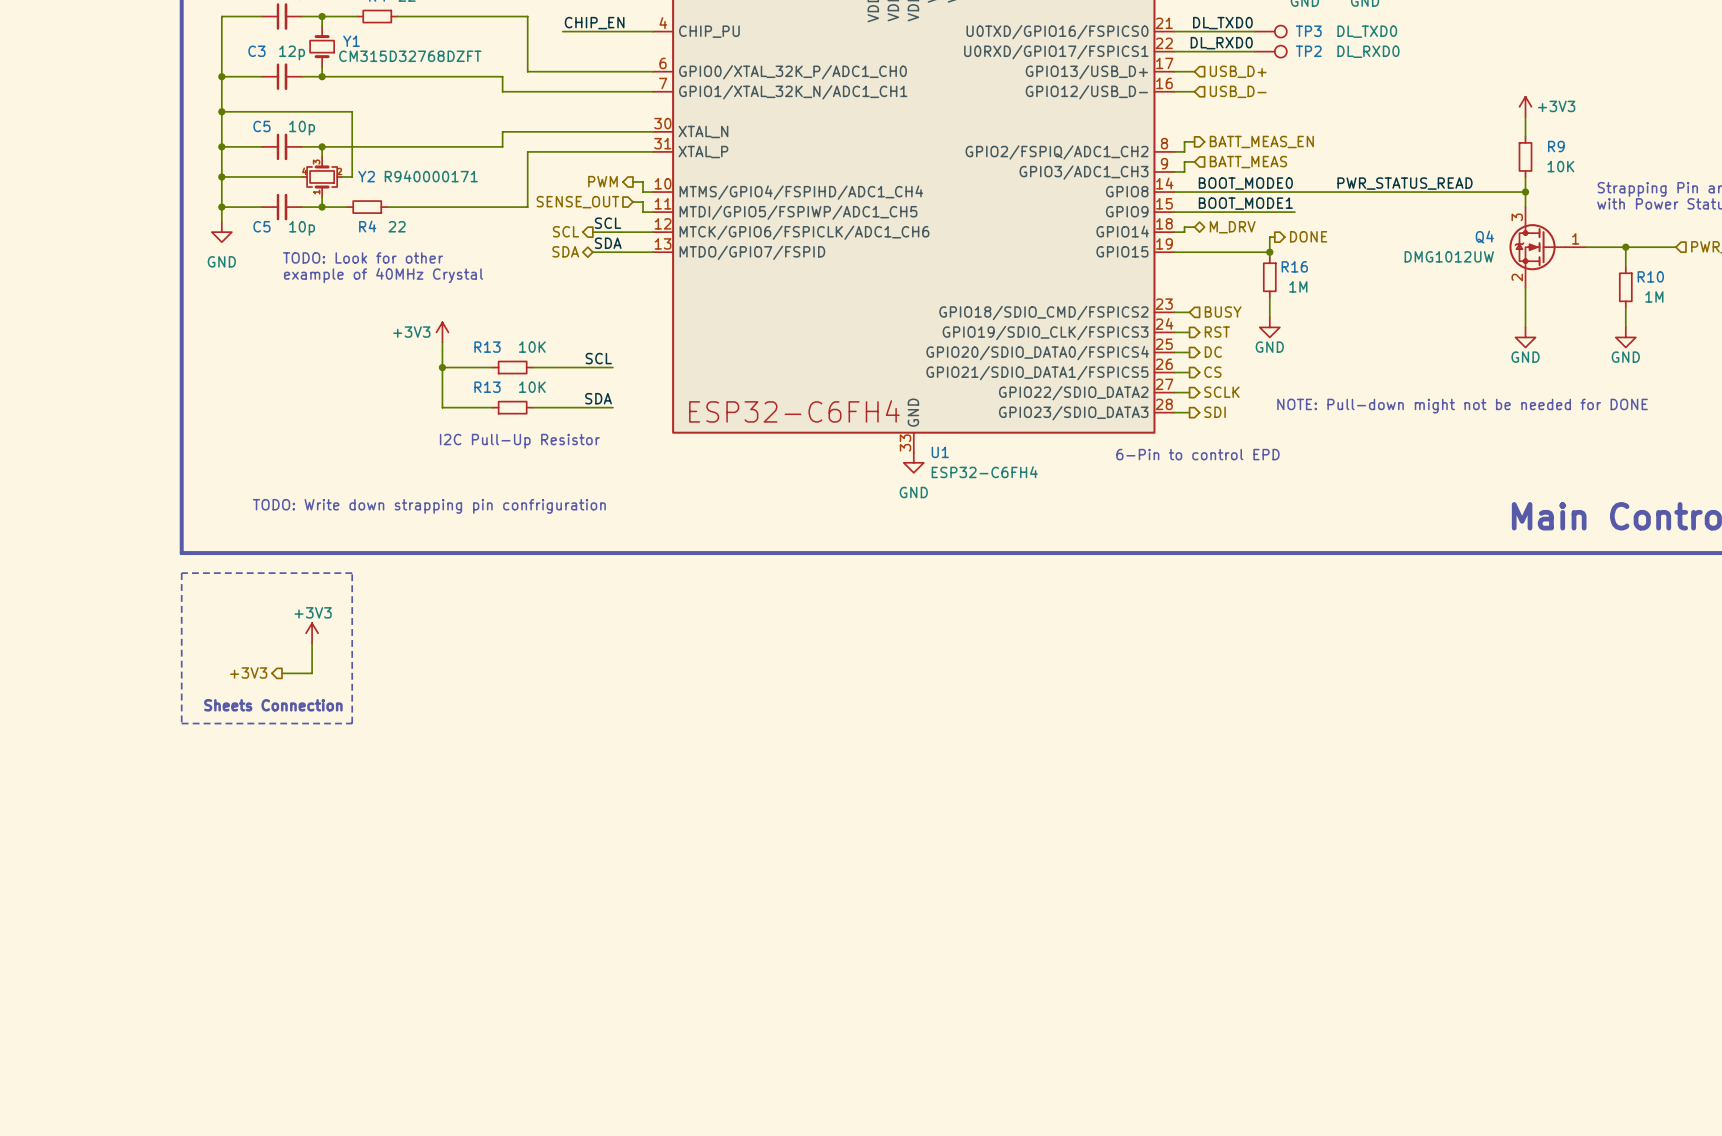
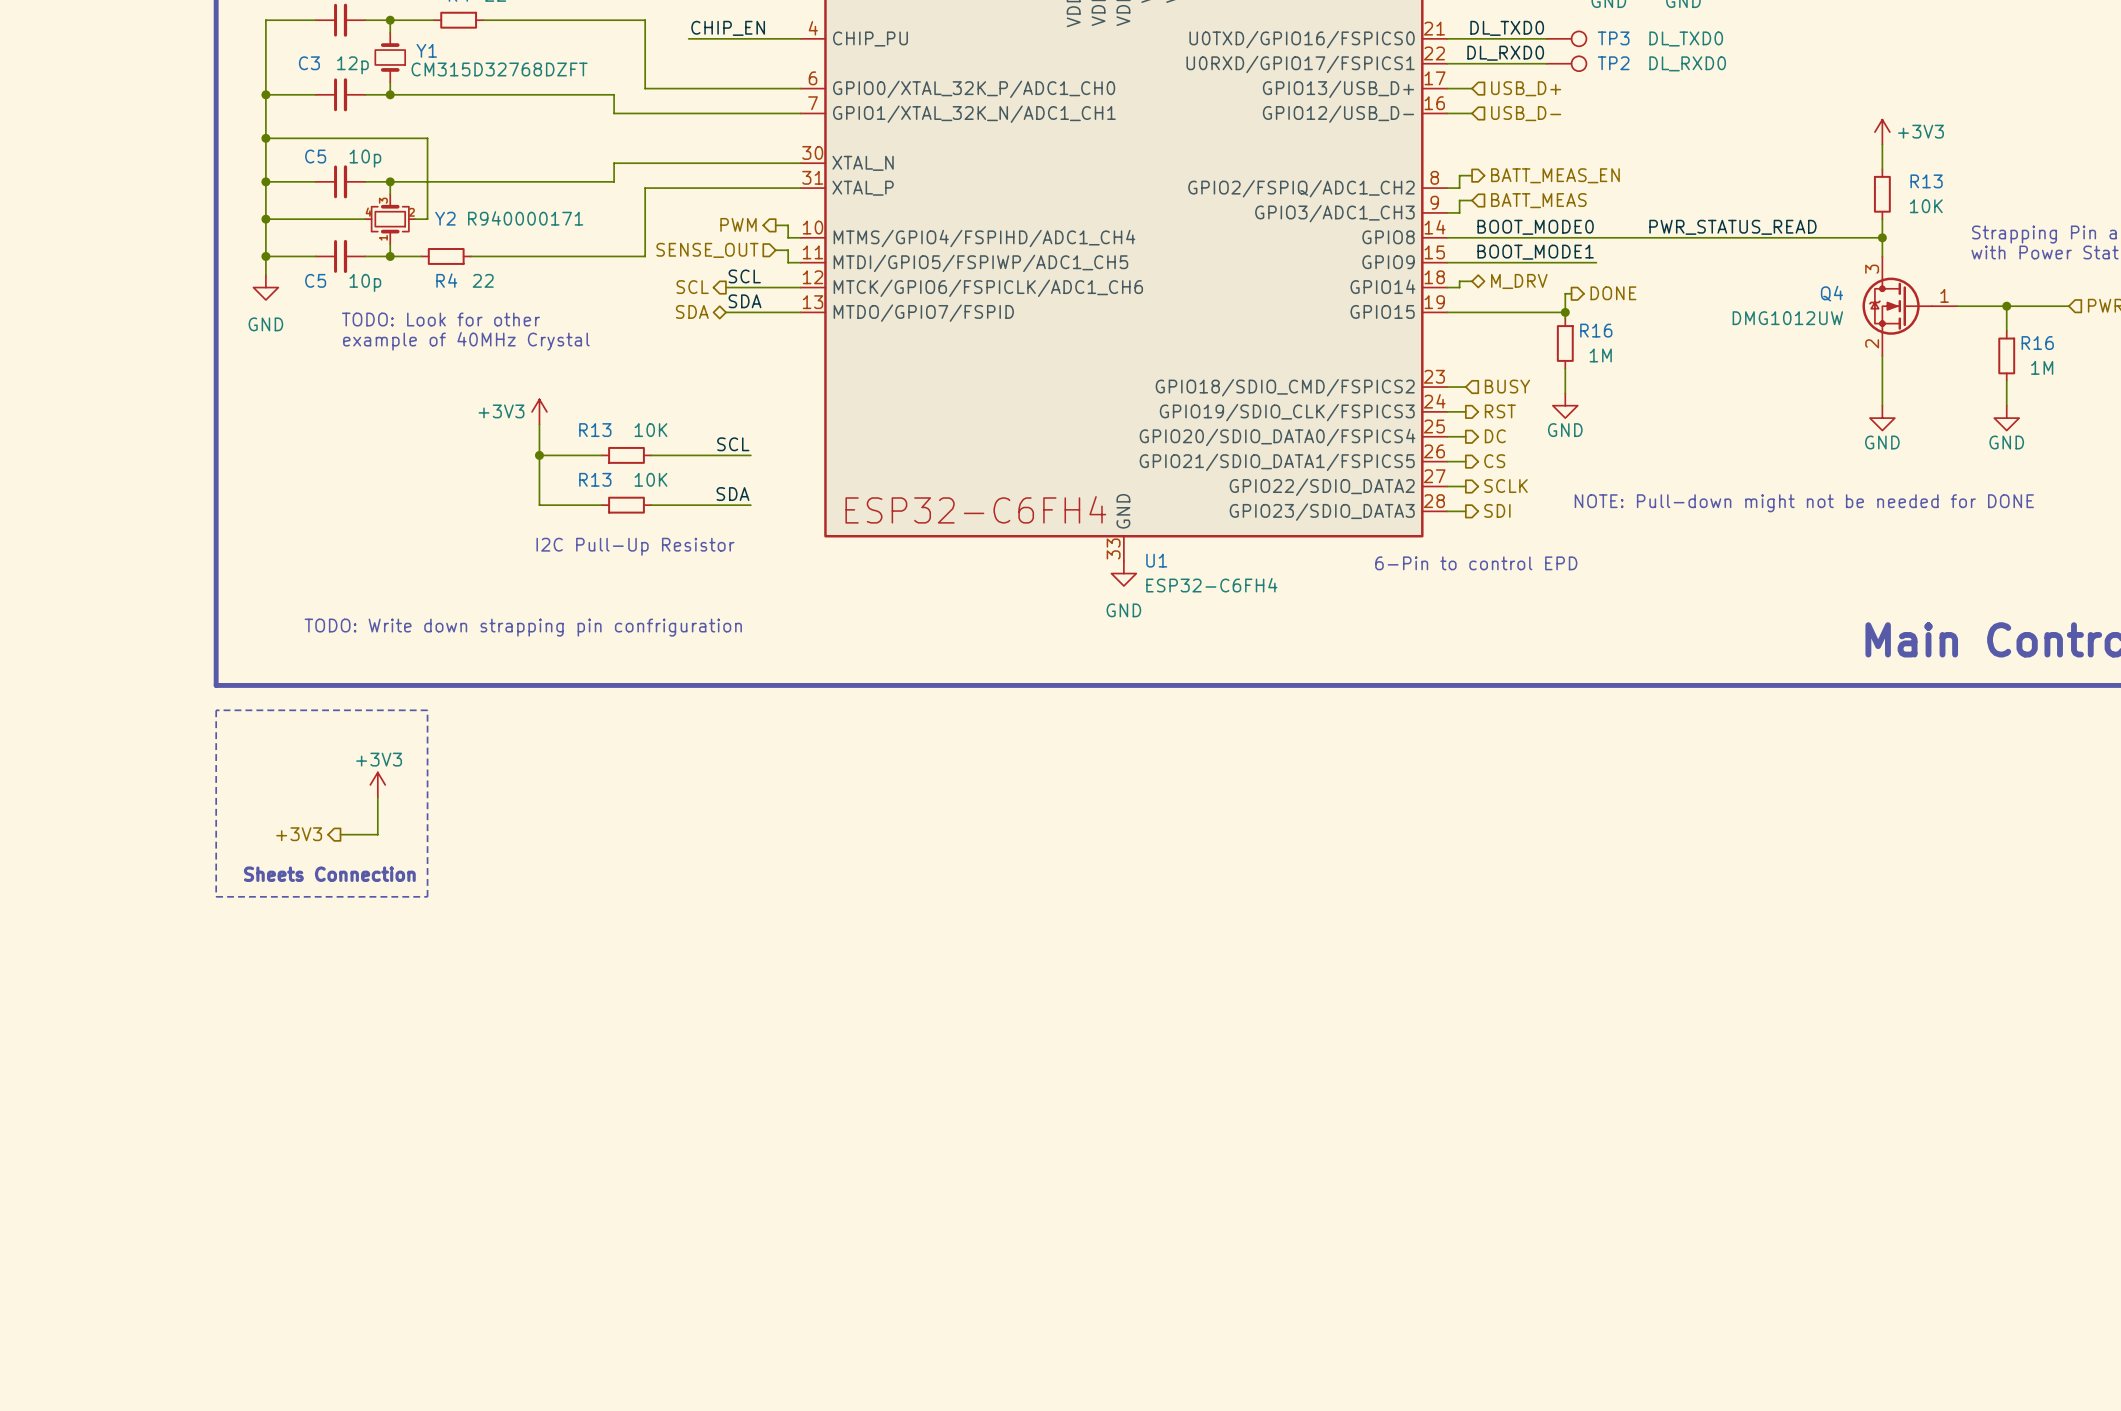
R9 name: R9 (1556, 146) -> R13 (1926, 181)
R10 name: R10 (1650, 276) -> R16 (2037, 343)

